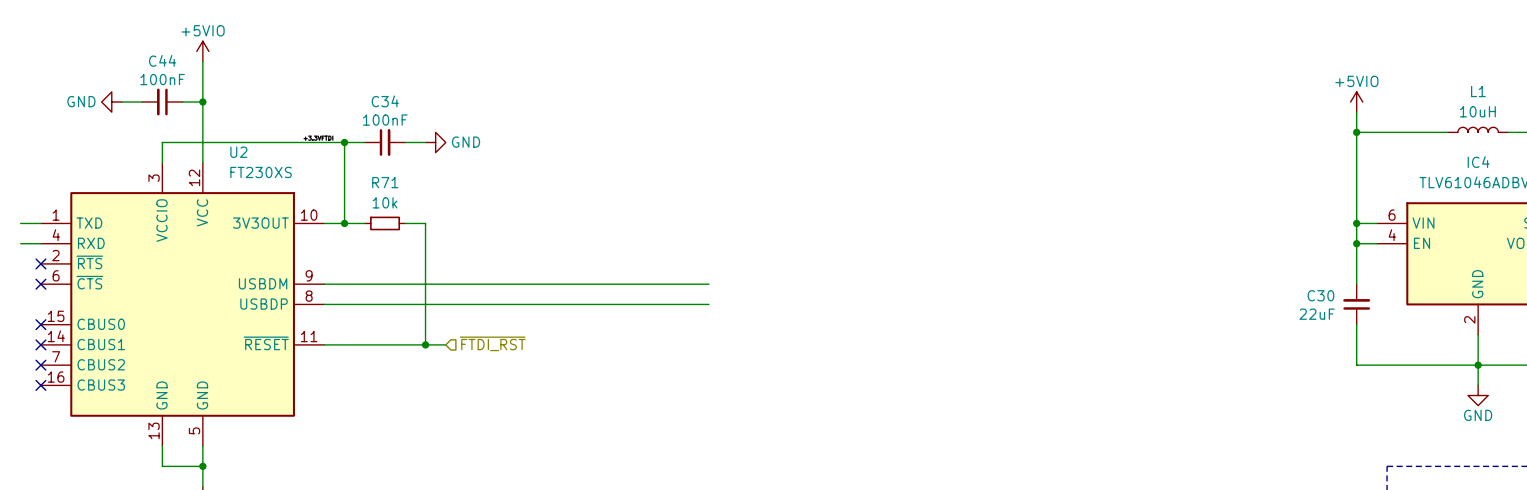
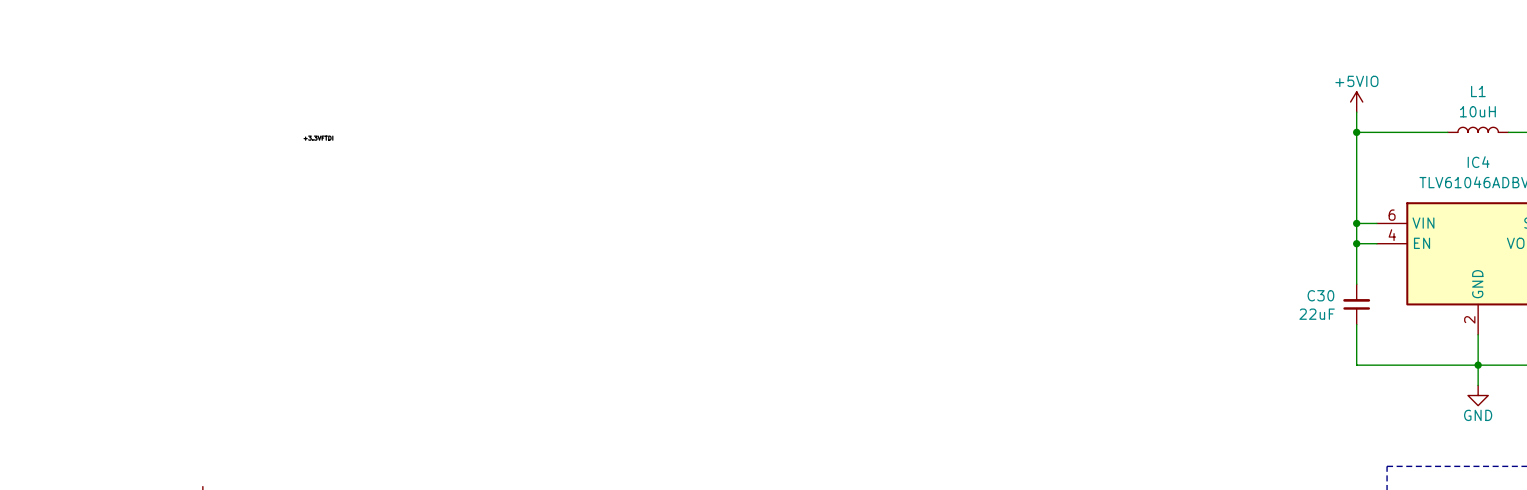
power symbol: +5VIO (202, 51) -> none
wire: (202, 61) (202, 162) -> none
power symbol: GND (111, 102) -> none
wire: (121, 102) (142, 102) -> none
C44: 100nF (162, 102) -> none
wire: (182, 102) (202, 102) -> none
junction: (202, 102) -> none
wire: (344, 142) (344, 223) -> none
junction: (344, 142) -> none
wire: (364, 142) (162, 142) (162, 162) -> none
C34: 100nF (385, 142) -> none
wire: (405, 142) (425, 142) -> none
power symbol: GND (435, 142) -> none
wire: (20, 223) (40, 223) -> none
wire: (324, 223) (364, 223) -> none
junction: (344, 223) -> none
R71: 10k (385, 223) -> none
wire: (405, 223) (425, 223) (425, 344) -> none
wire: (20, 243) (40, 243) -> none
no-connect mark: (40, 263) -> none
no-connect mark: (40, 284) -> none
wire: (324, 284) (708, 284) -> none
U2: FT230XS (182, 304) -> none
wire: (324, 304) (708, 304) -> none
no-connect mark: (40, 324) -> none
hierarchical label: ~{FTDI_RST} (492, 343) -> none
no-connect mark: (40, 344) -> none
wire: (324, 344) (445, 344) -> none
junction: (425, 344) -> none
no-connect mark: (40, 365) -> none
no-connect mark: (40, 385) -> none
wire: (162, 446) (162, 466) (202, 466) -> none
wire: (202, 446) (202, 486) -> none
junction: (202, 466) -> none

